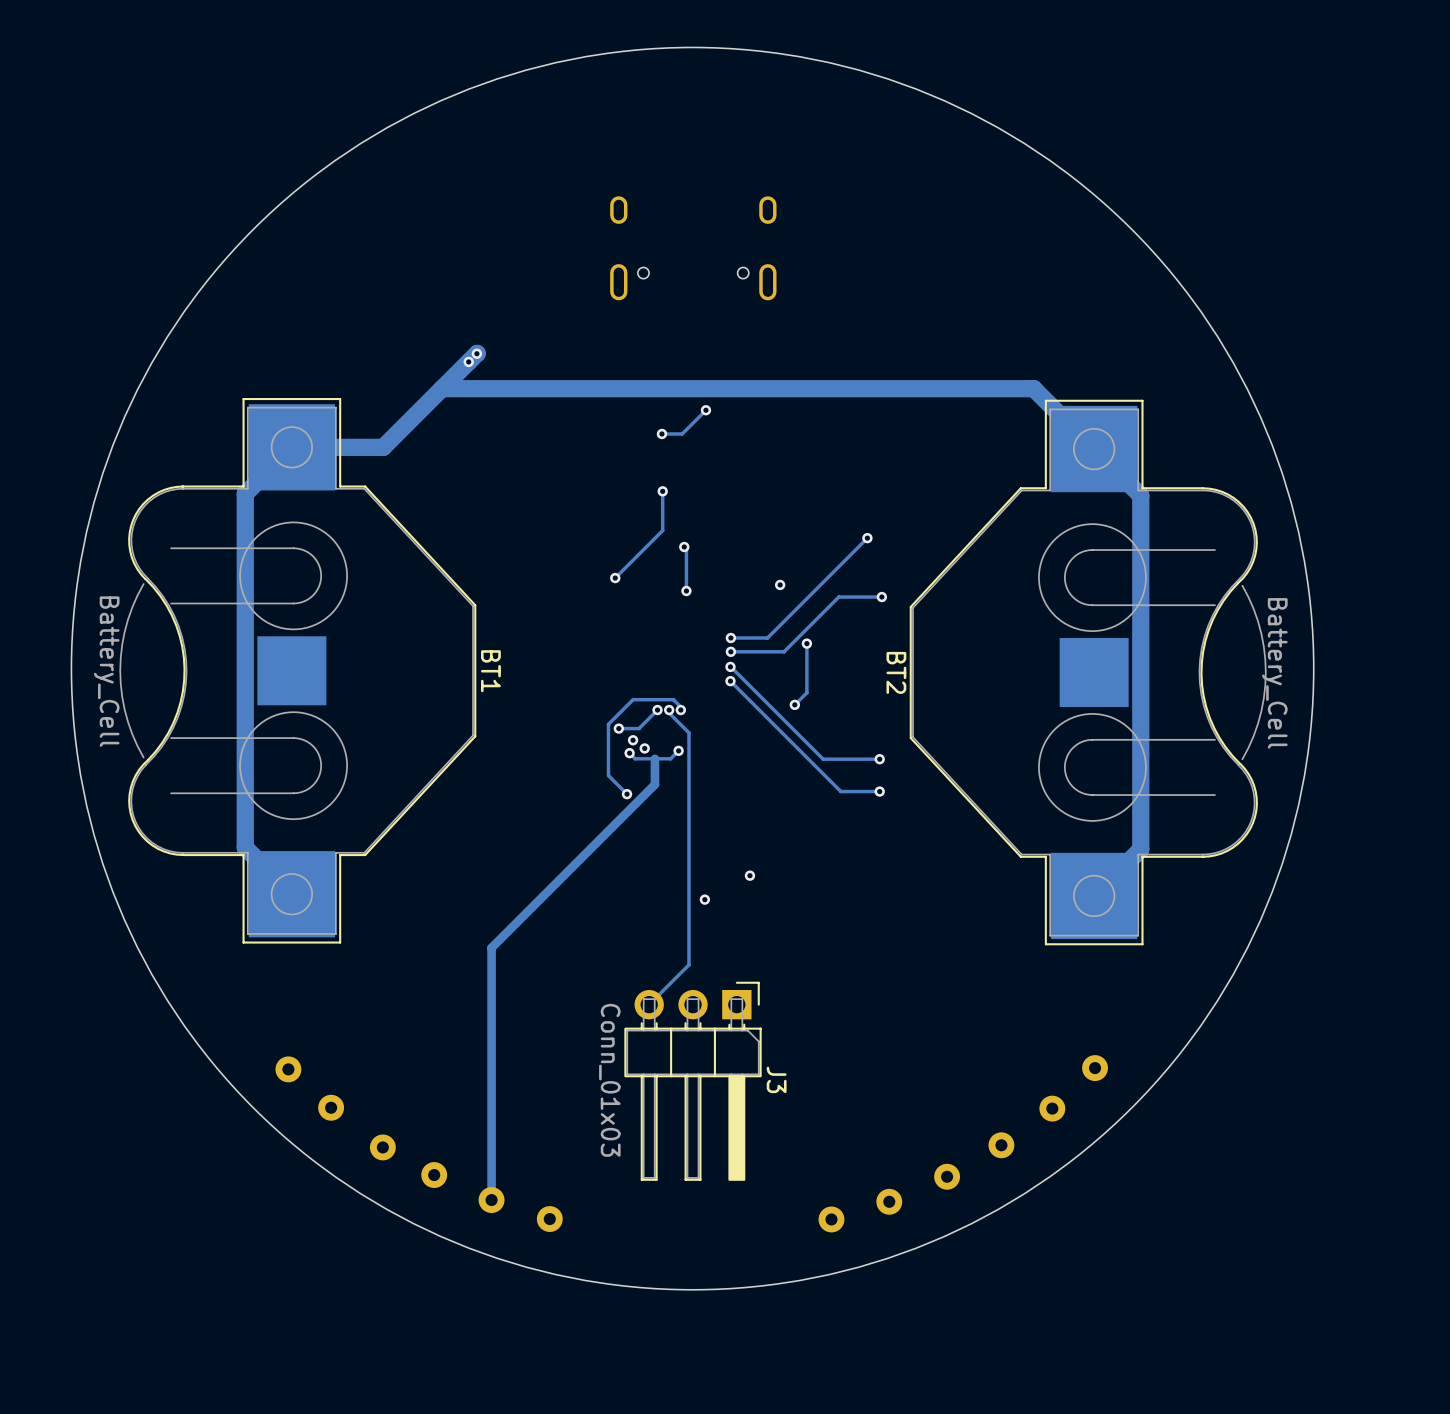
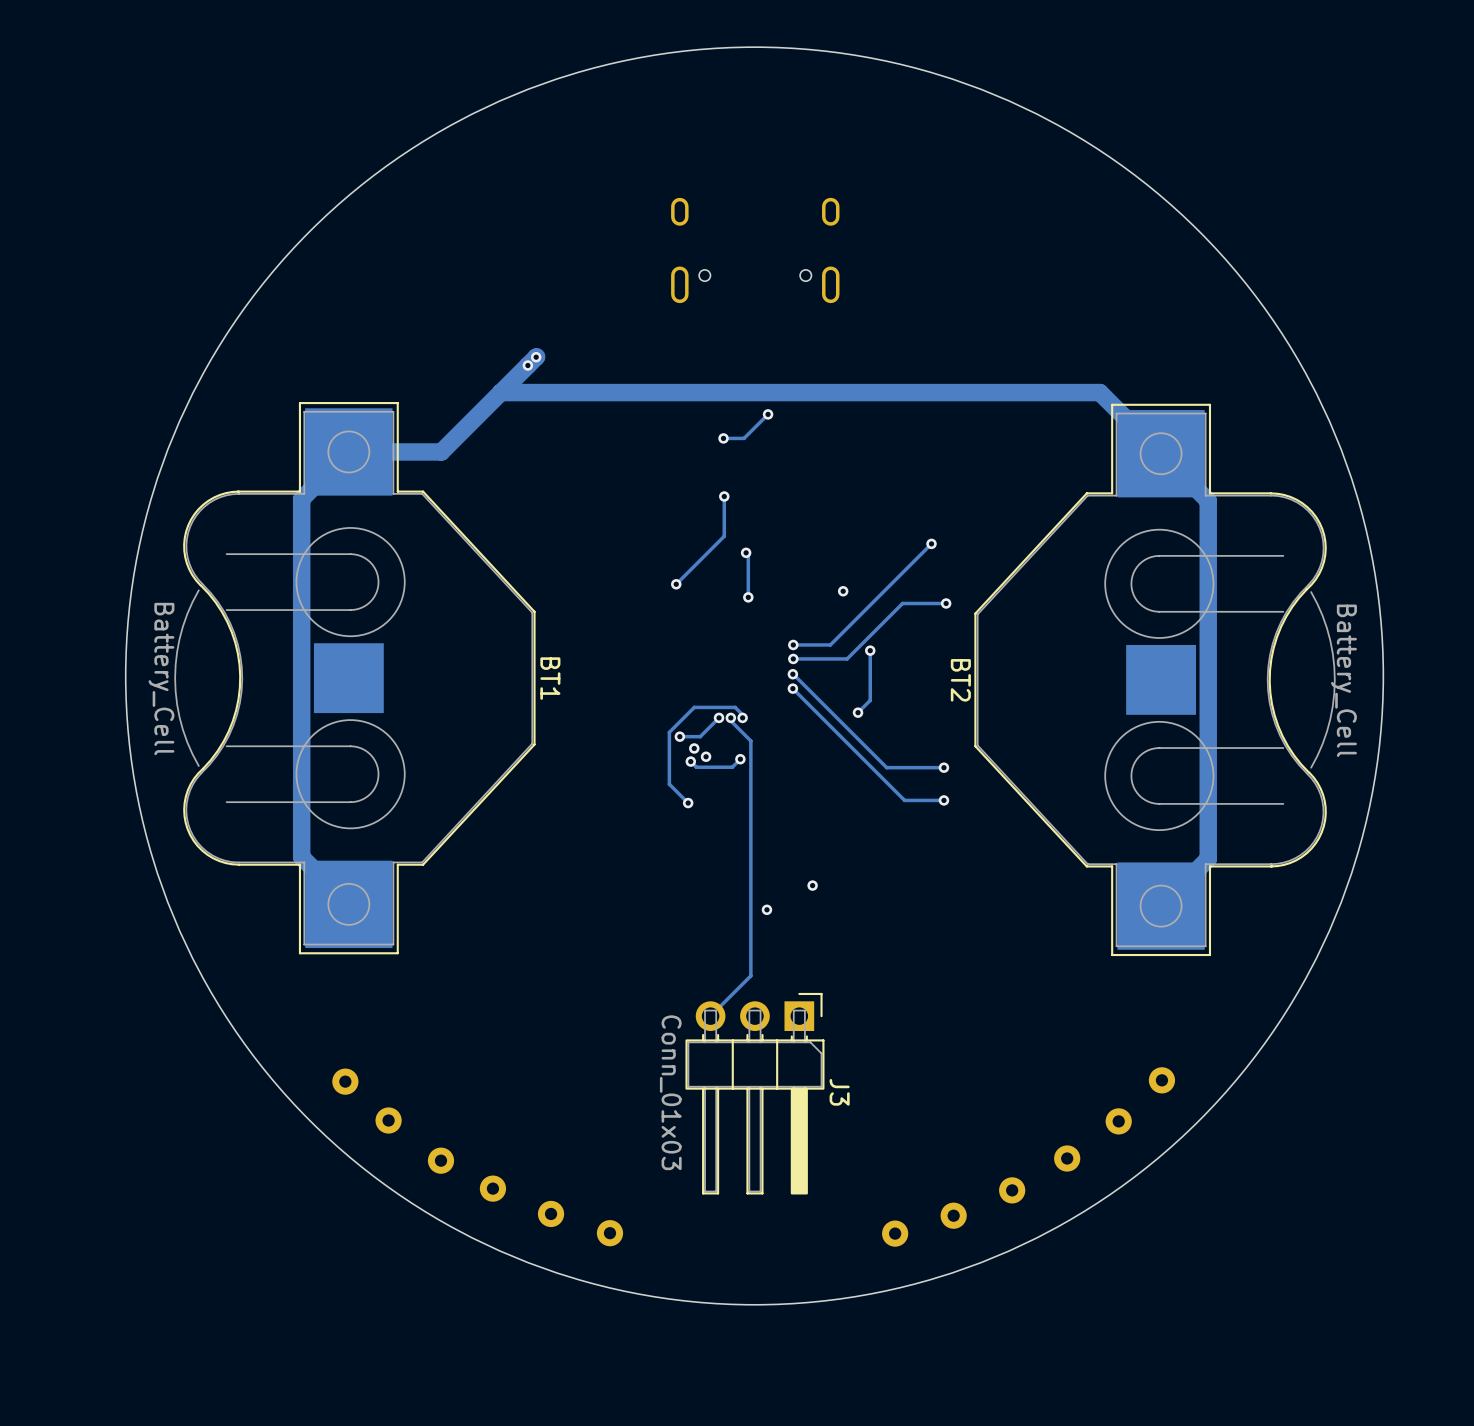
track: (654, 758) (654, 784) (491, 947) (491, 1200) -> none

